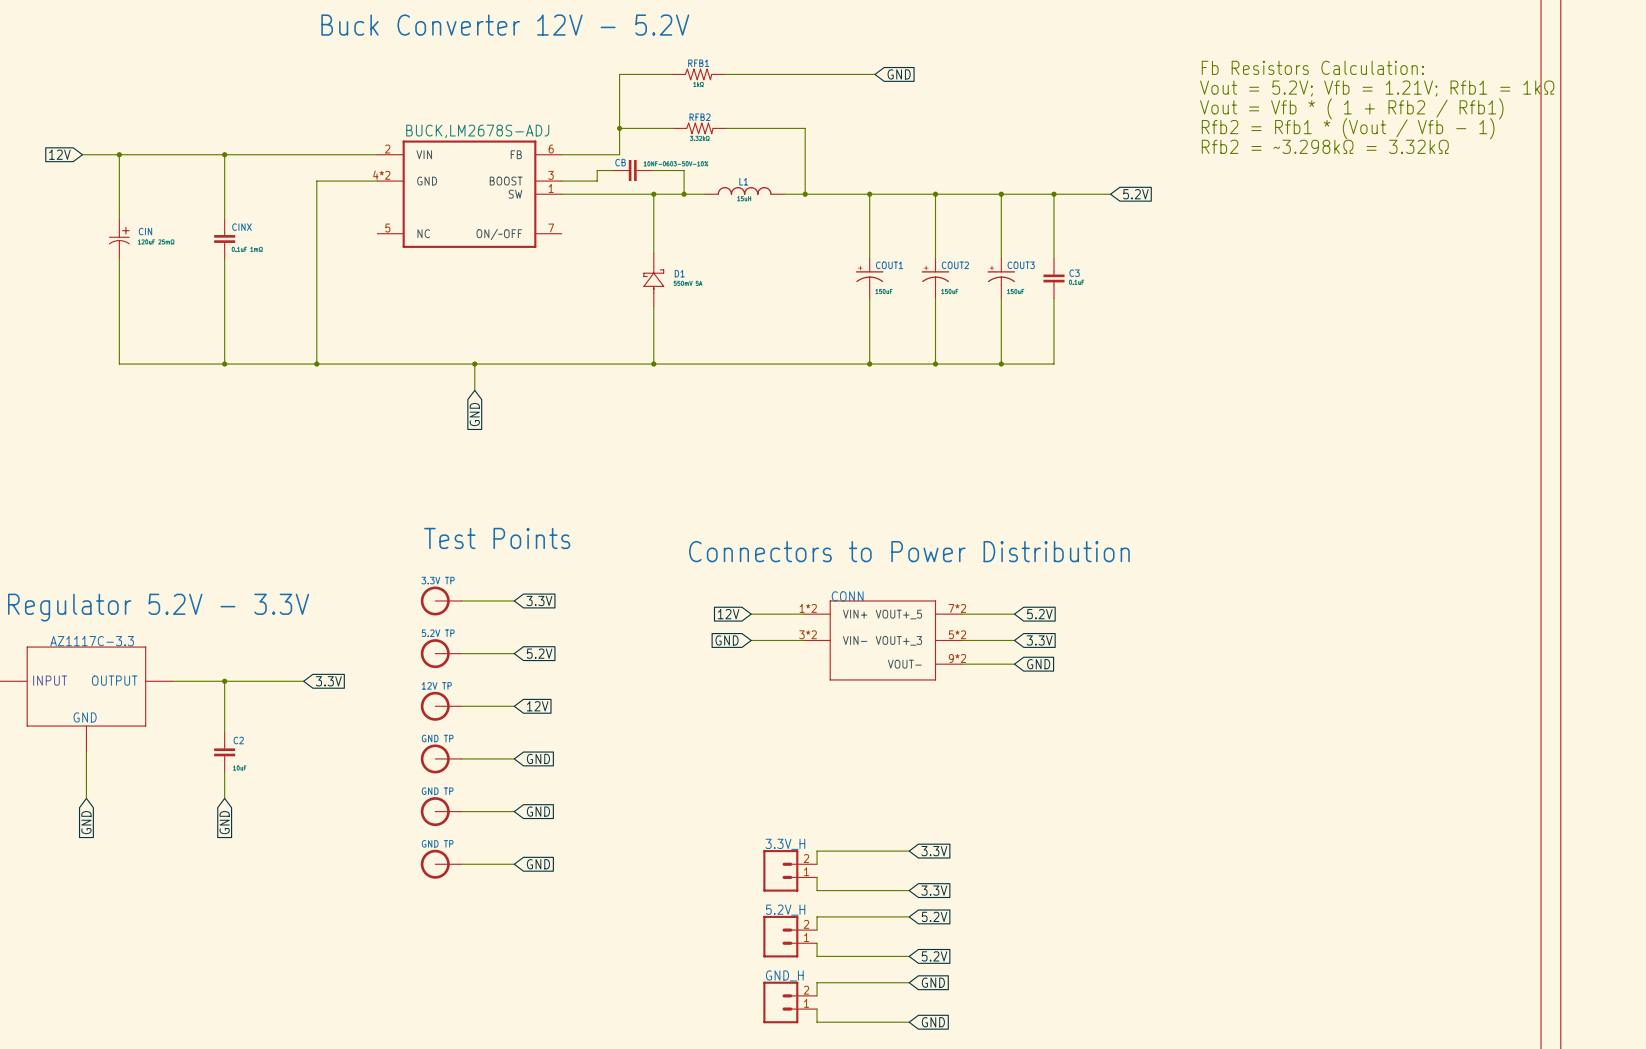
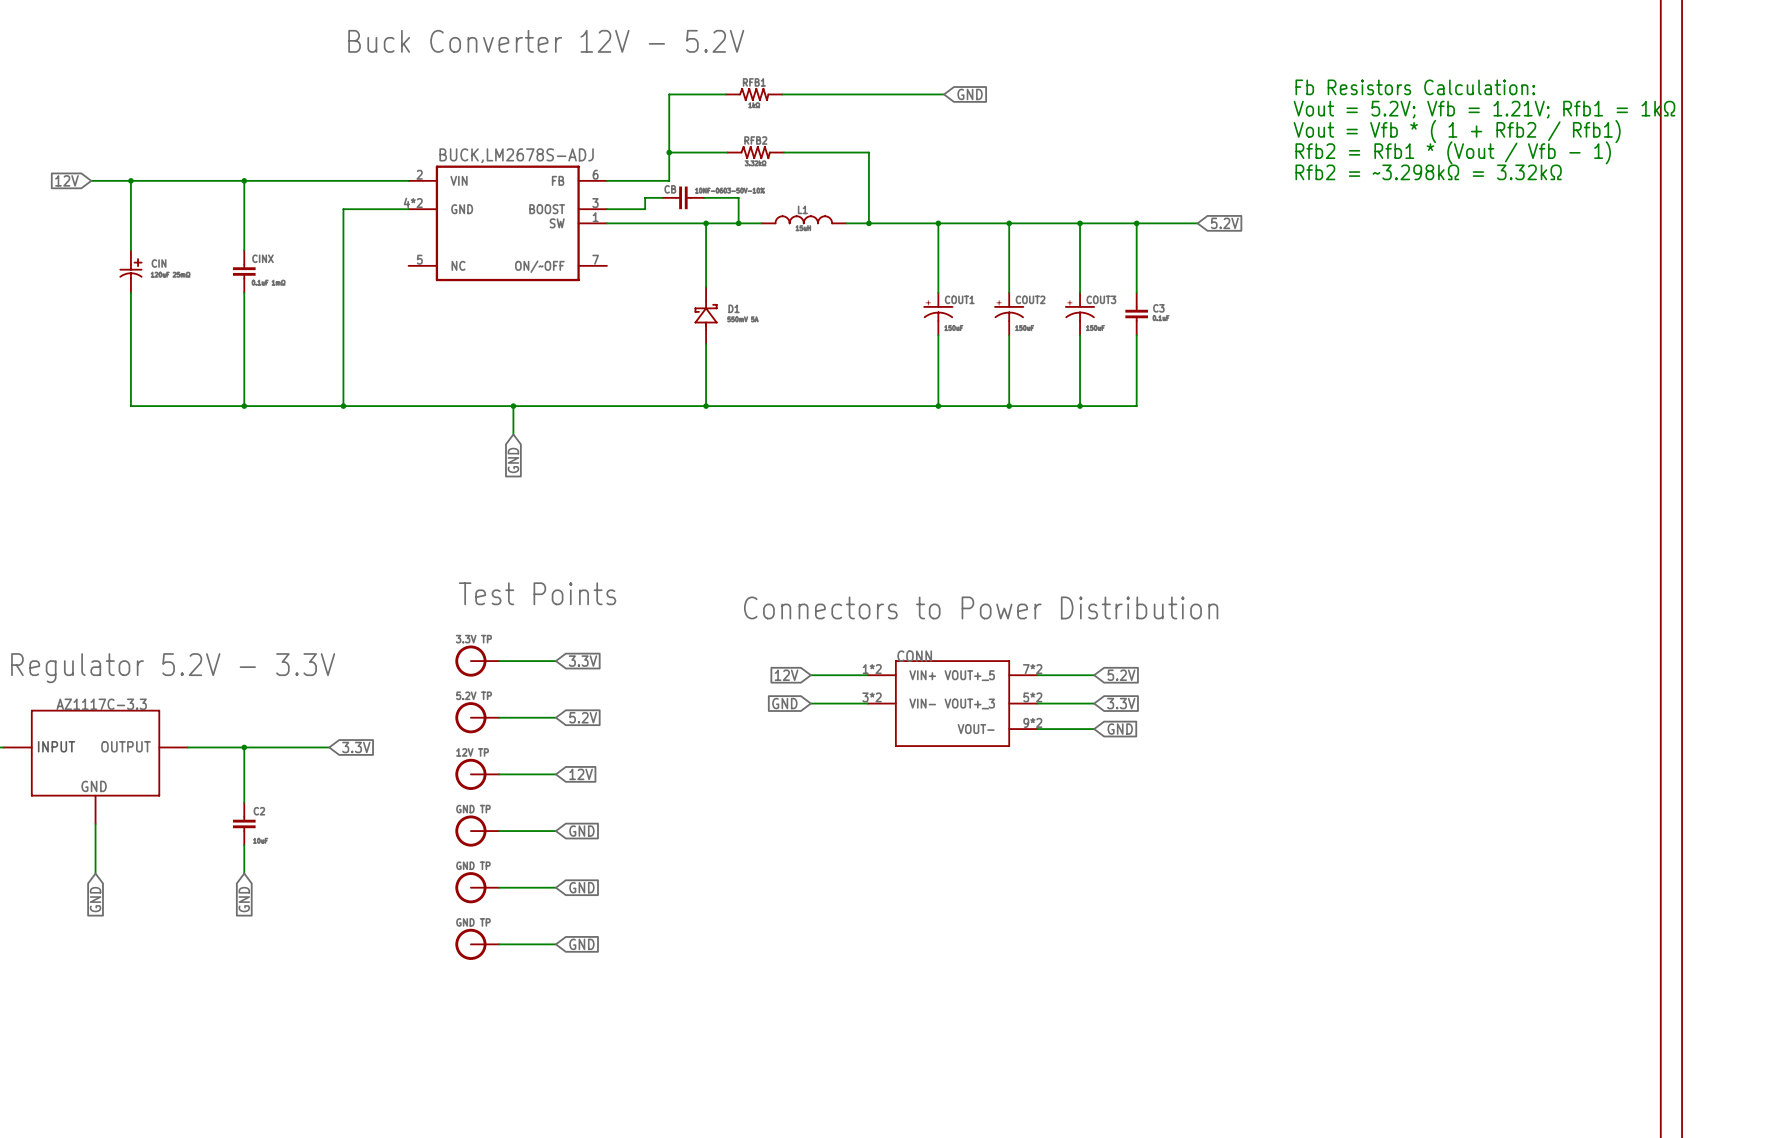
wire: (909, 851) (817, 851) (817, 864) -> none
global label: 3.3V (934, 851) -> none
3.3V_H: (790, 870) -> none
wire: (817, 877) (817, 890) (909, 890) -> none
global label: 3.3V (934, 890) -> none
wire: (909, 916) (817, 916) (817, 930) -> none
global label: 5.2V (934, 916) -> none
5.2V_H: (790, 936) -> none
wire: (817, 943) (817, 956) (909, 956) -> none
global label: 5.2V (934, 956) -> none
wire: (909, 982) (817, 982) (817, 995) -> none
global label: GND (933, 982) -> none
GND_H: (790, 1002) -> none
wire: (817, 1009) (817, 1022) (909, 1022) -> none
global label: GND (933, 1022) -> none

